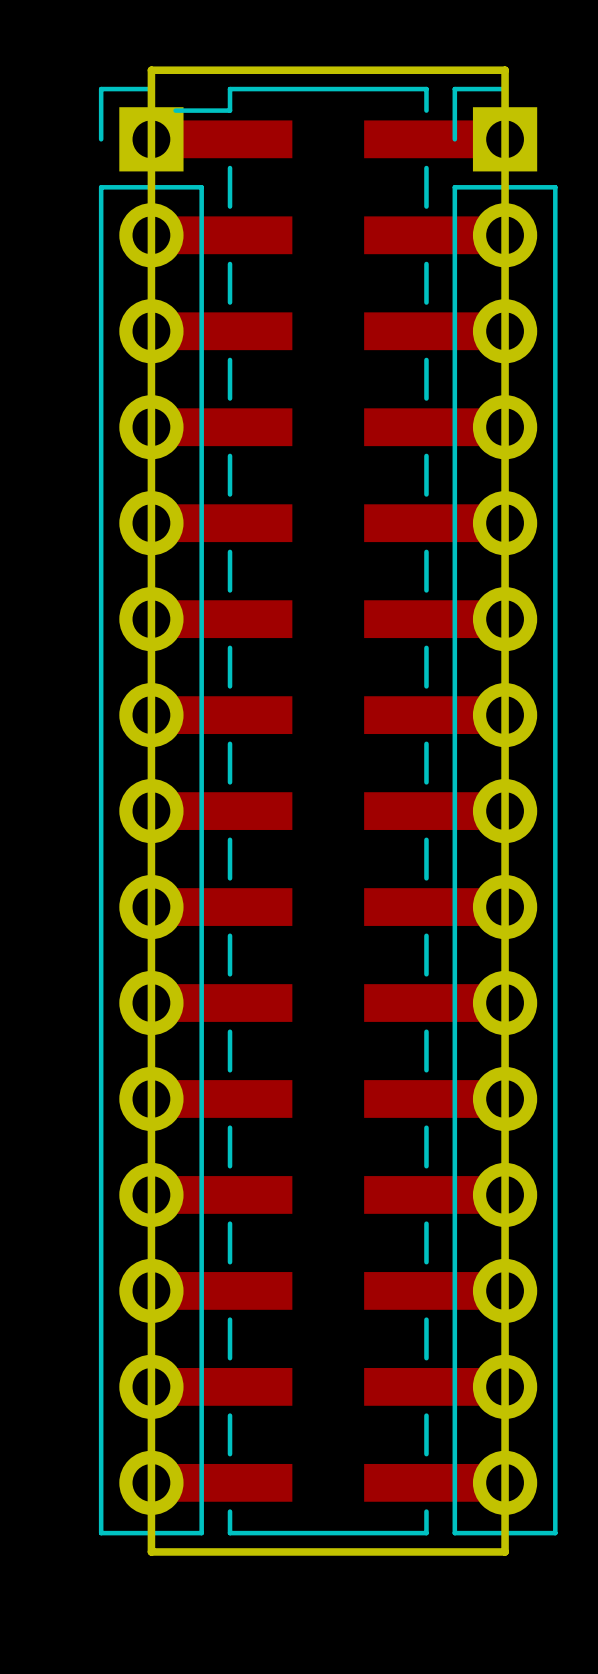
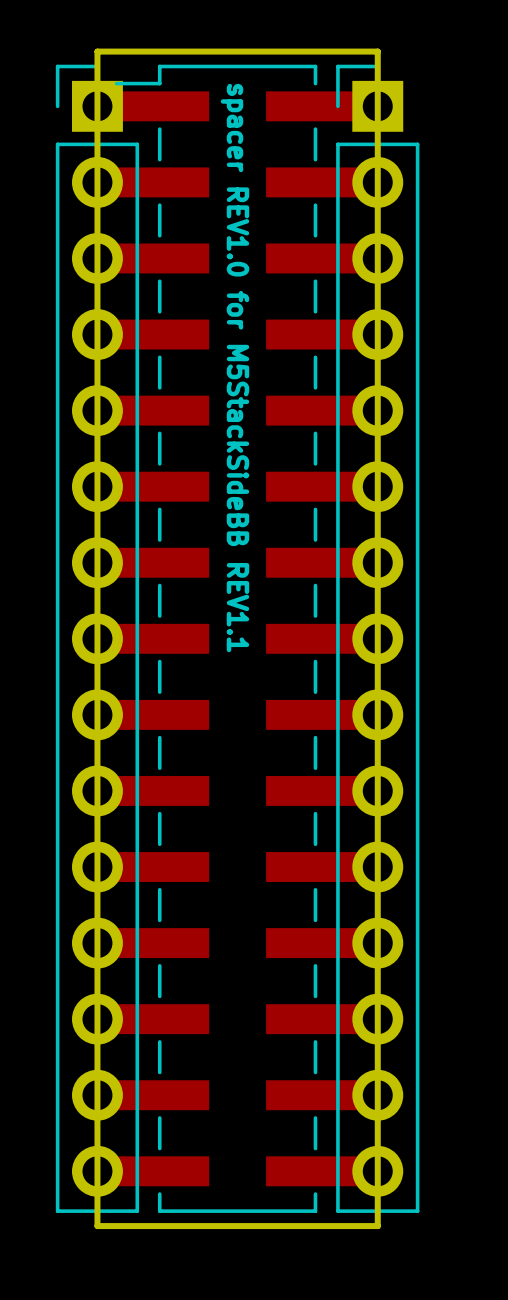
text: none -> spacer REV1.0 for M5StackSideBB REV1.1 (234, 368)

